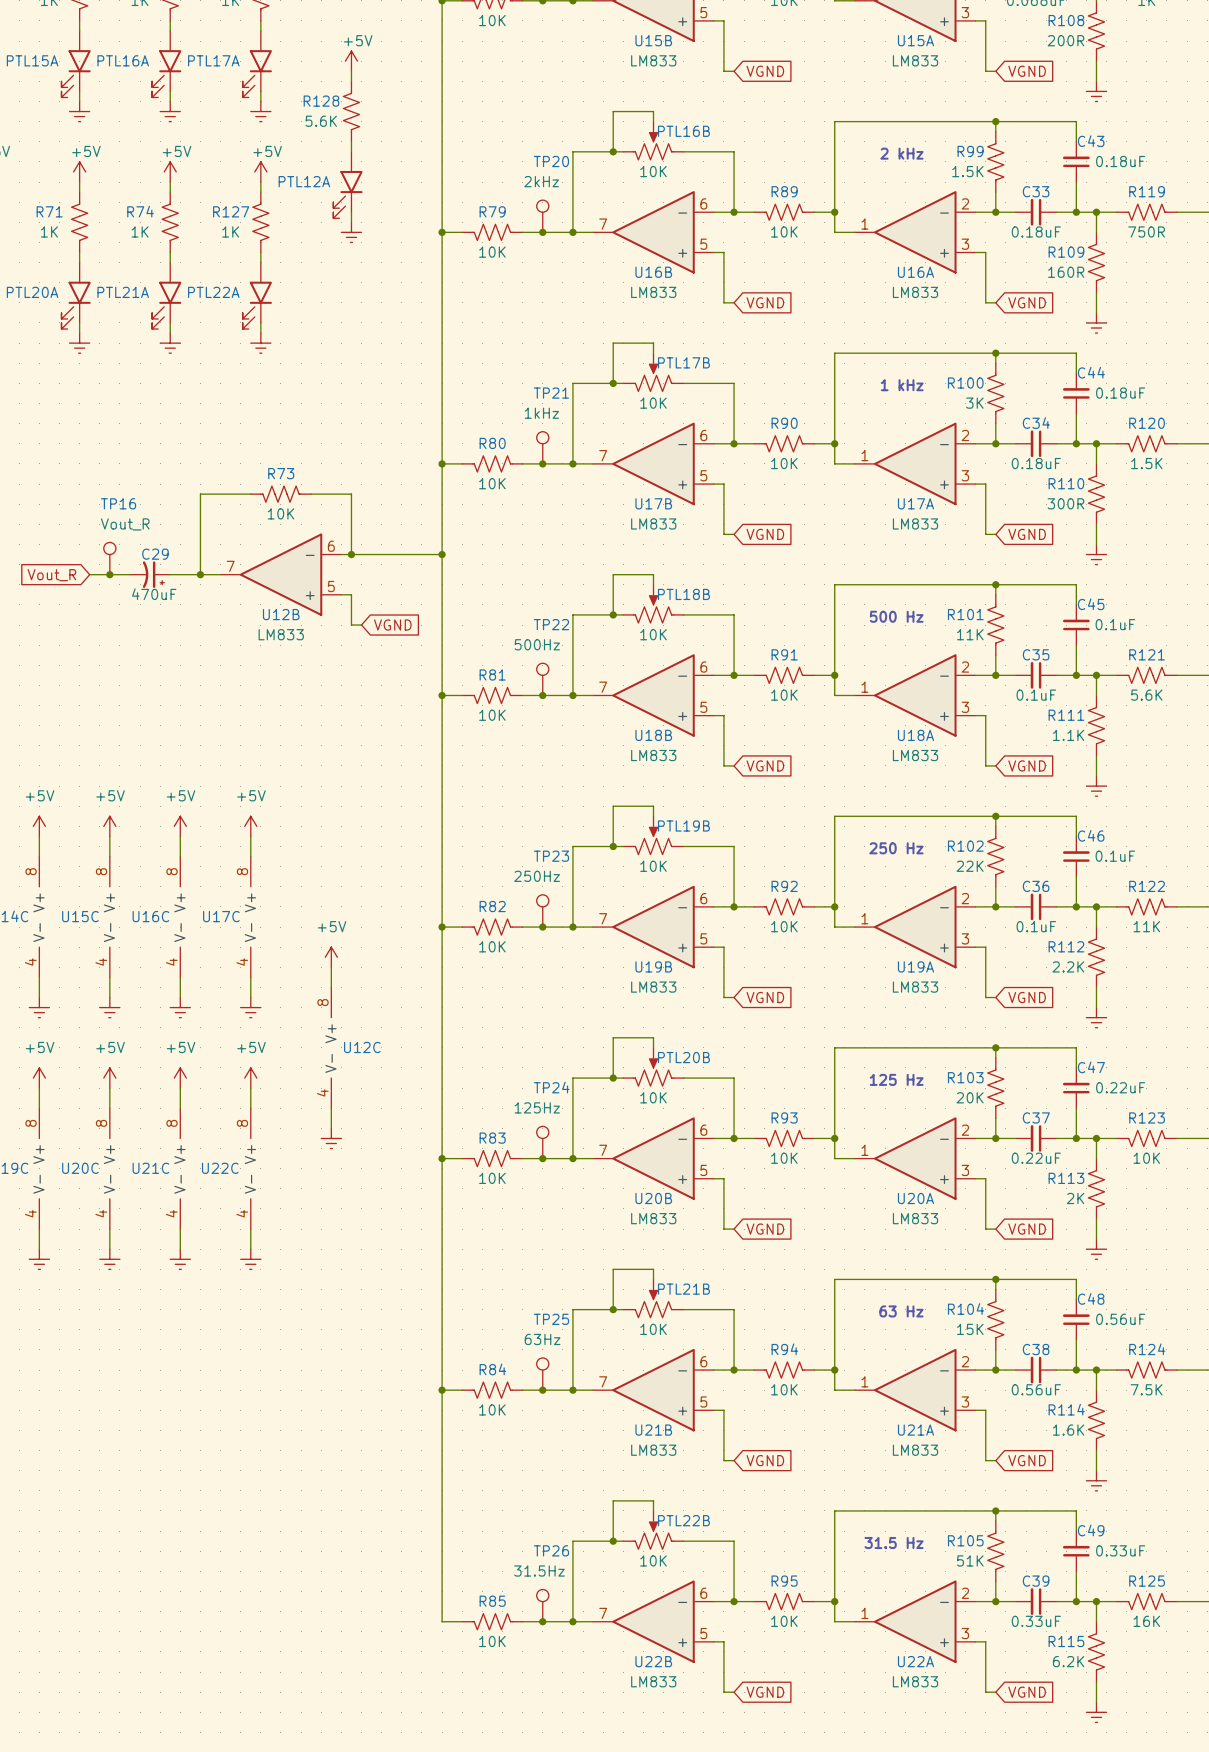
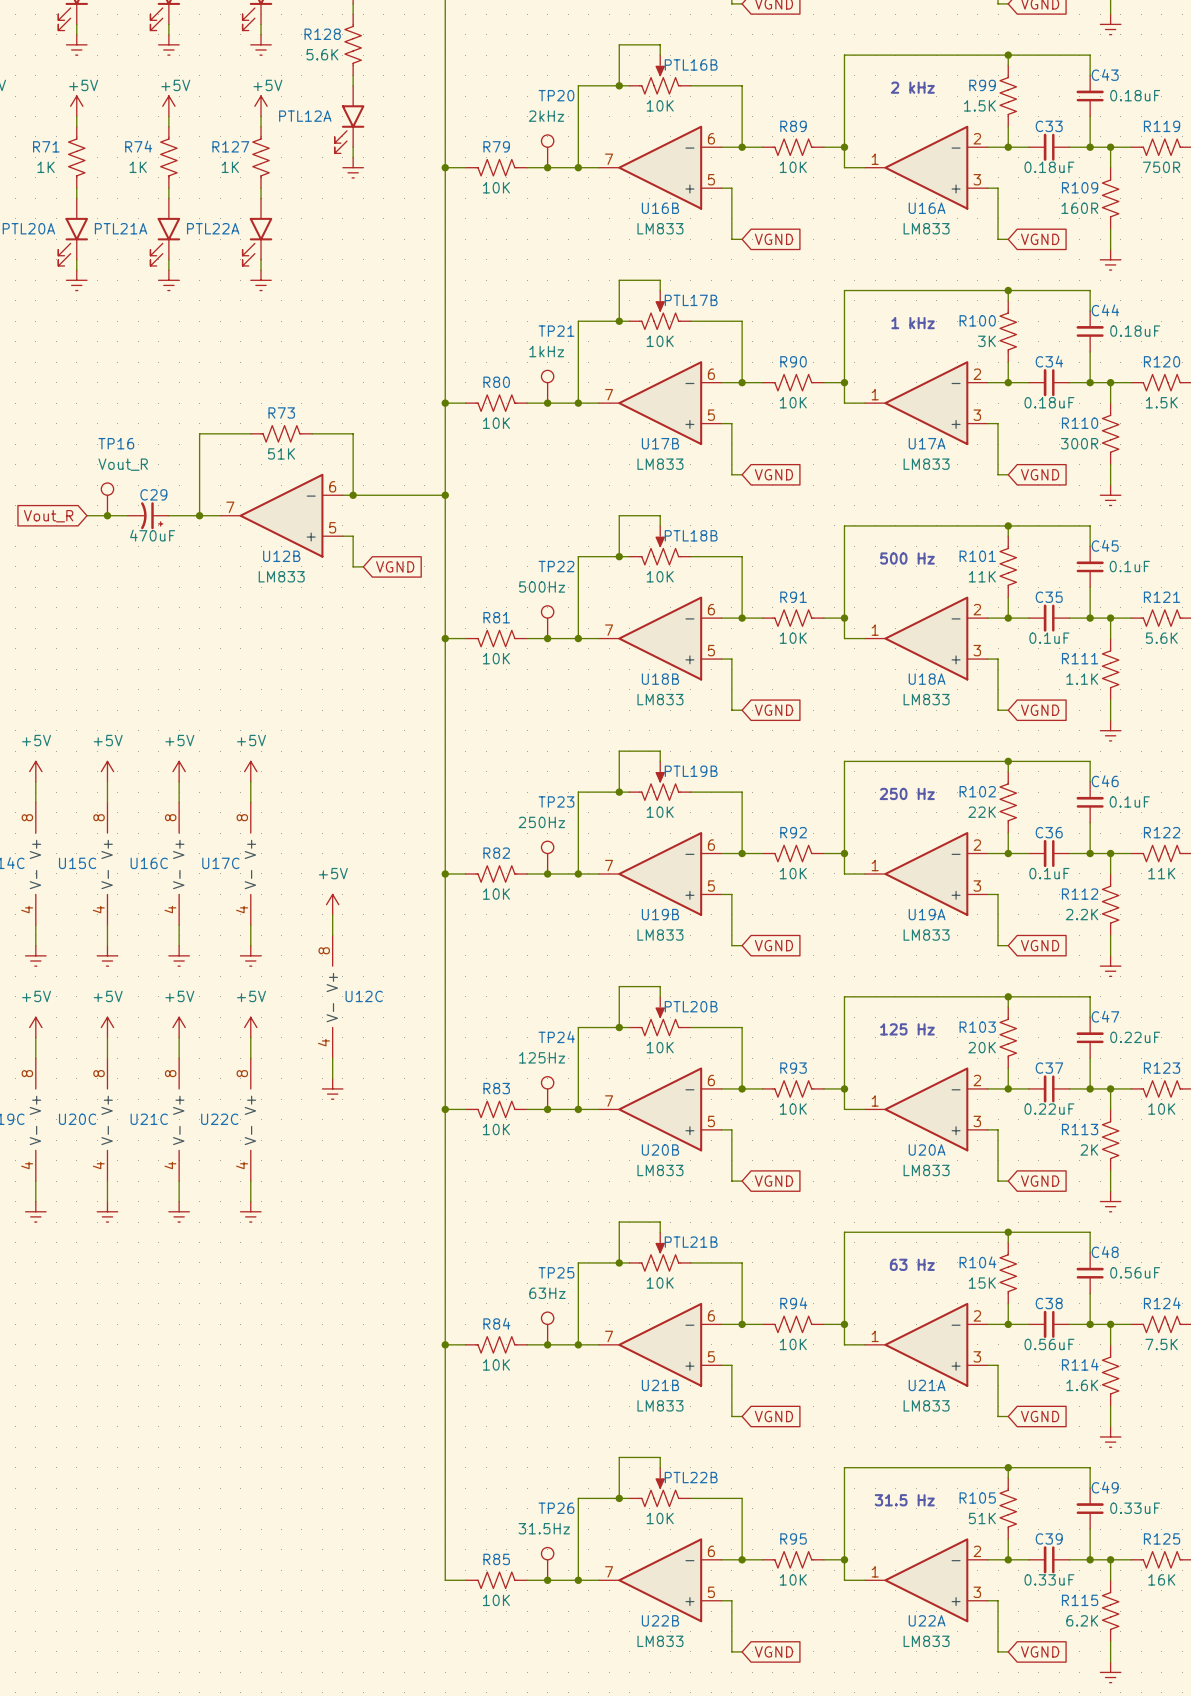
R73 value: 10K (280, 513) -> 51K (281, 453)

